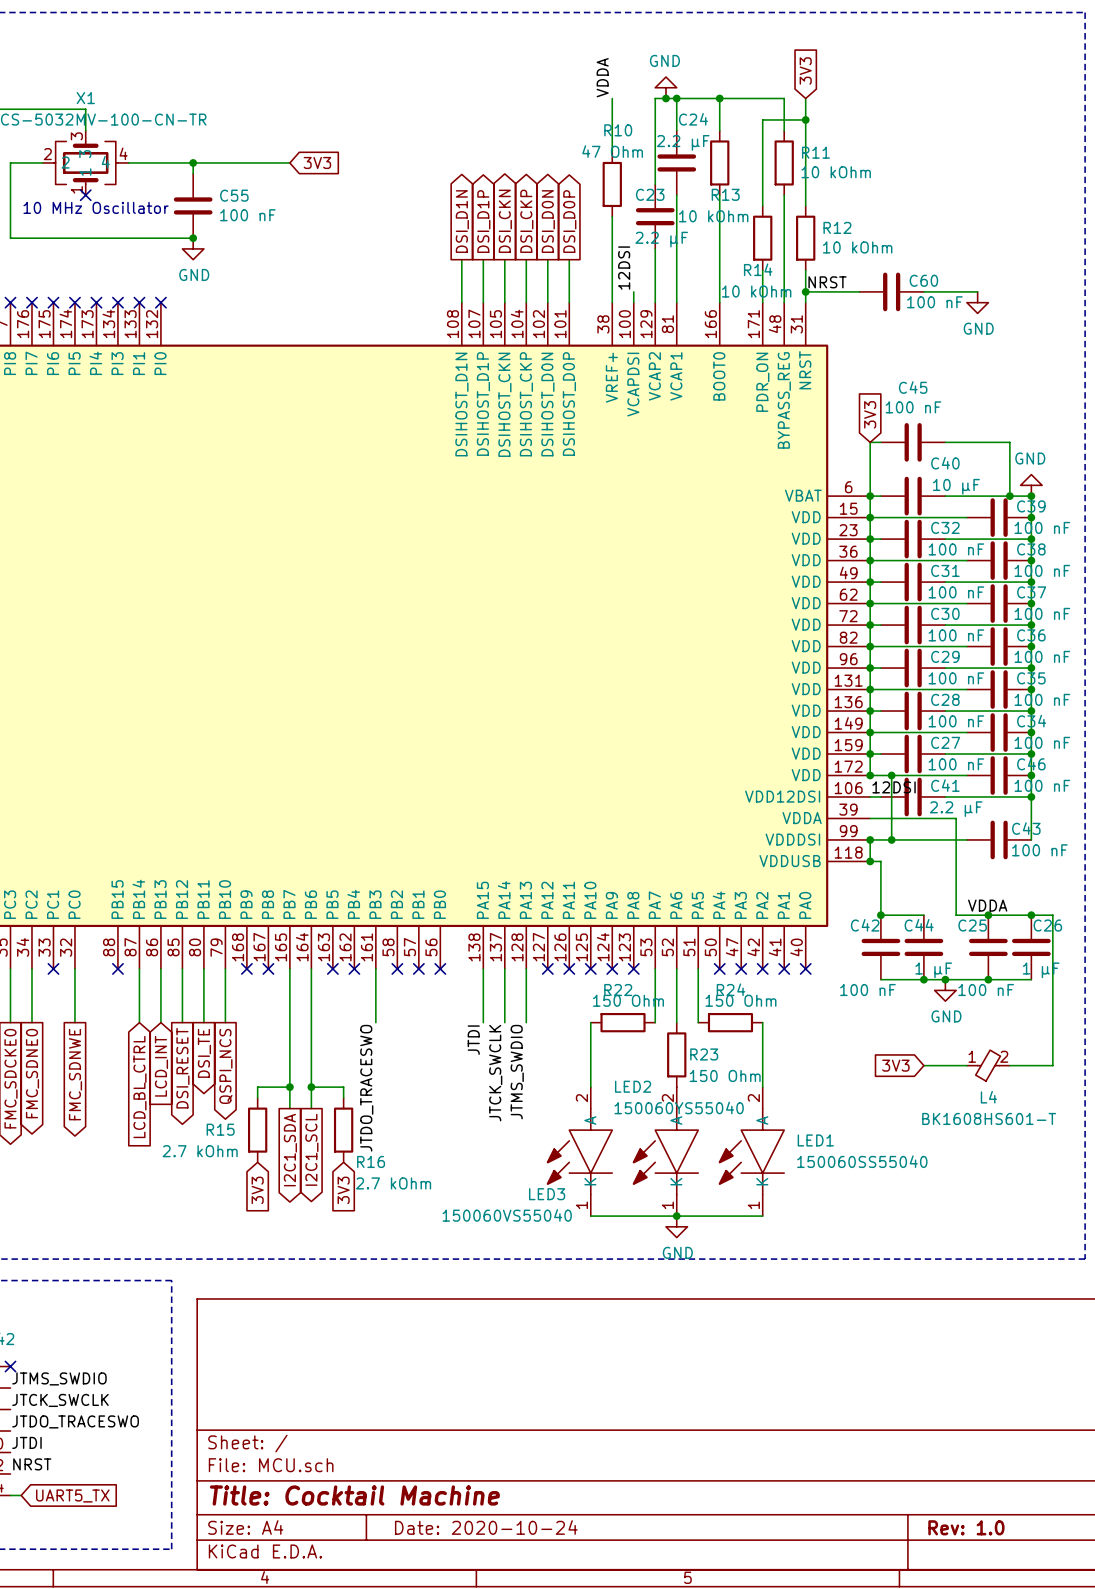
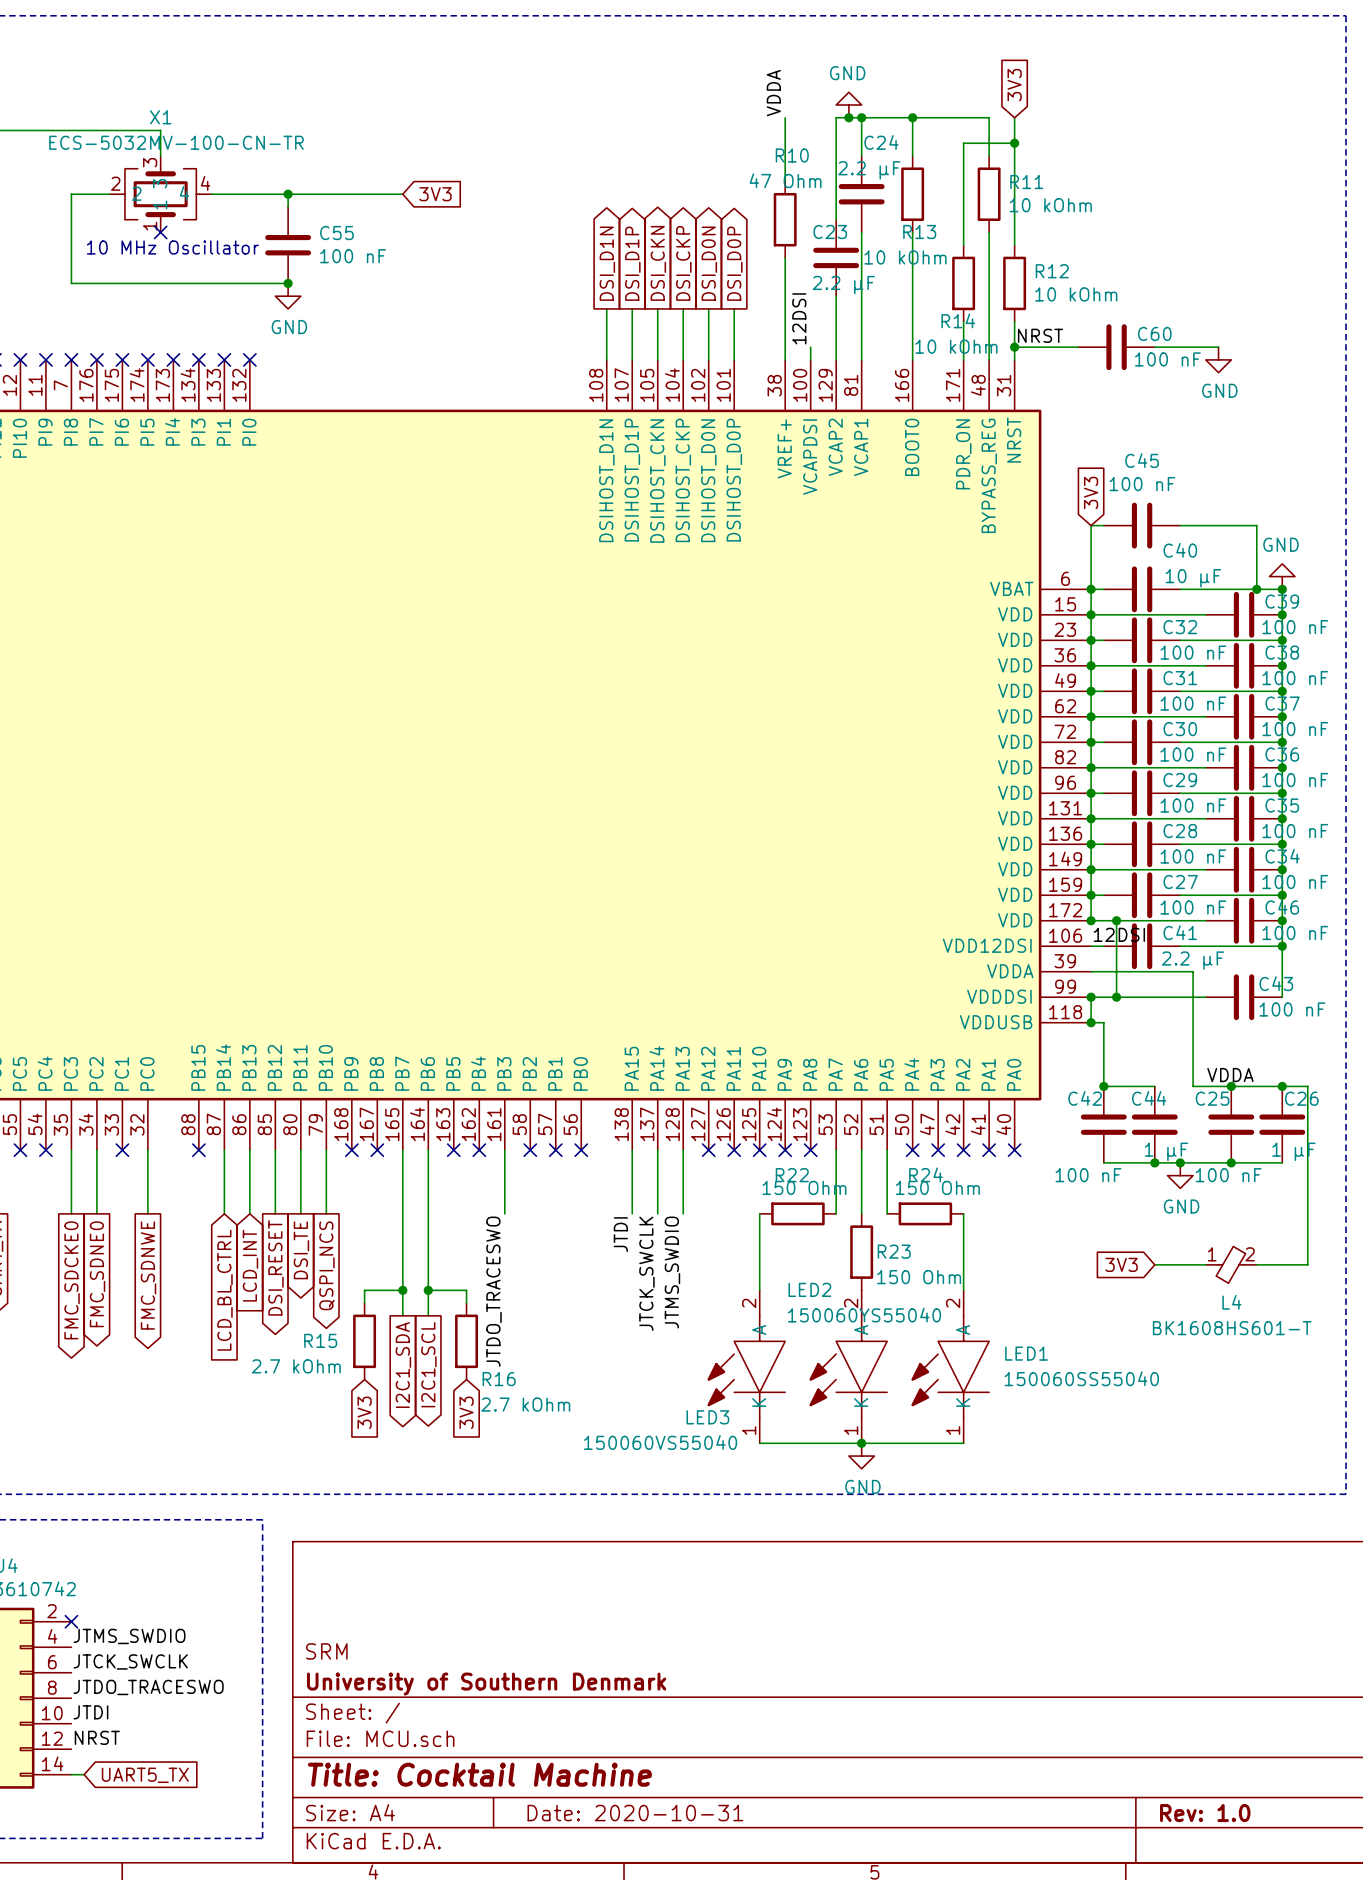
title block: none -> SRM (326, 1651)
title block: none -> University of Southern Denmark (486, 1684)
title block: Date: 2020-10-24 (486, 1527) -> Date: 2020-10-31 (635, 1813)

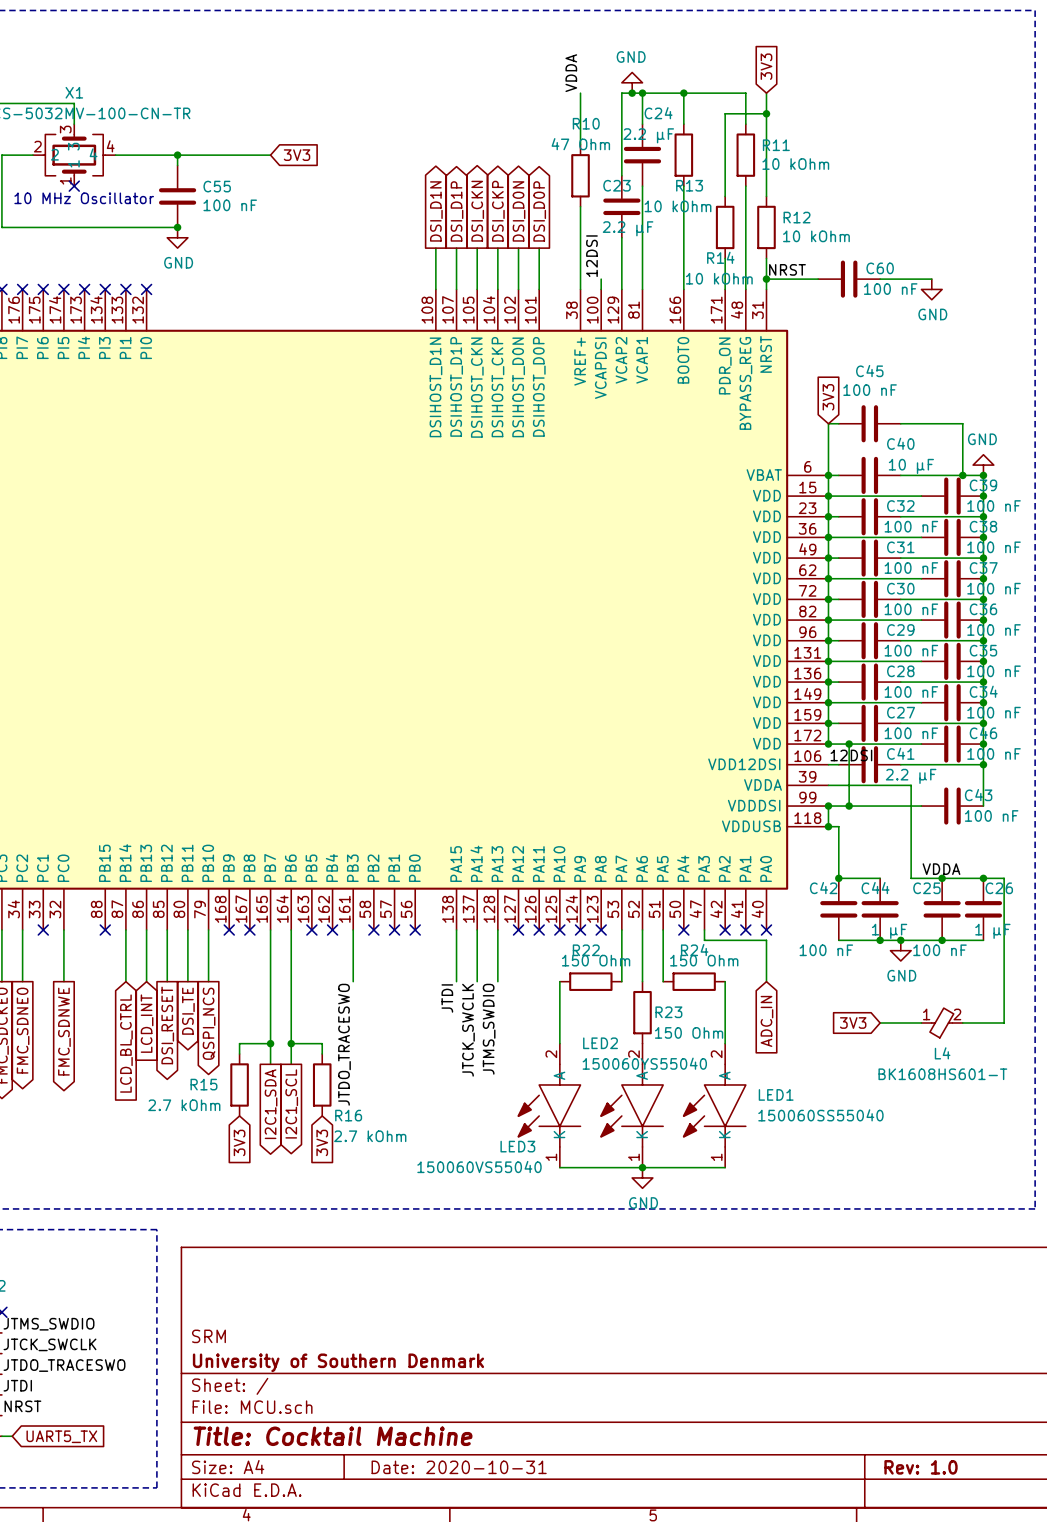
wire: none -> (704, 930) (704, 940) (766, 940) (766, 981)
no-connect mark: (938, 1150) -> none
global label: none -> ADC_IN (766, 1021)

